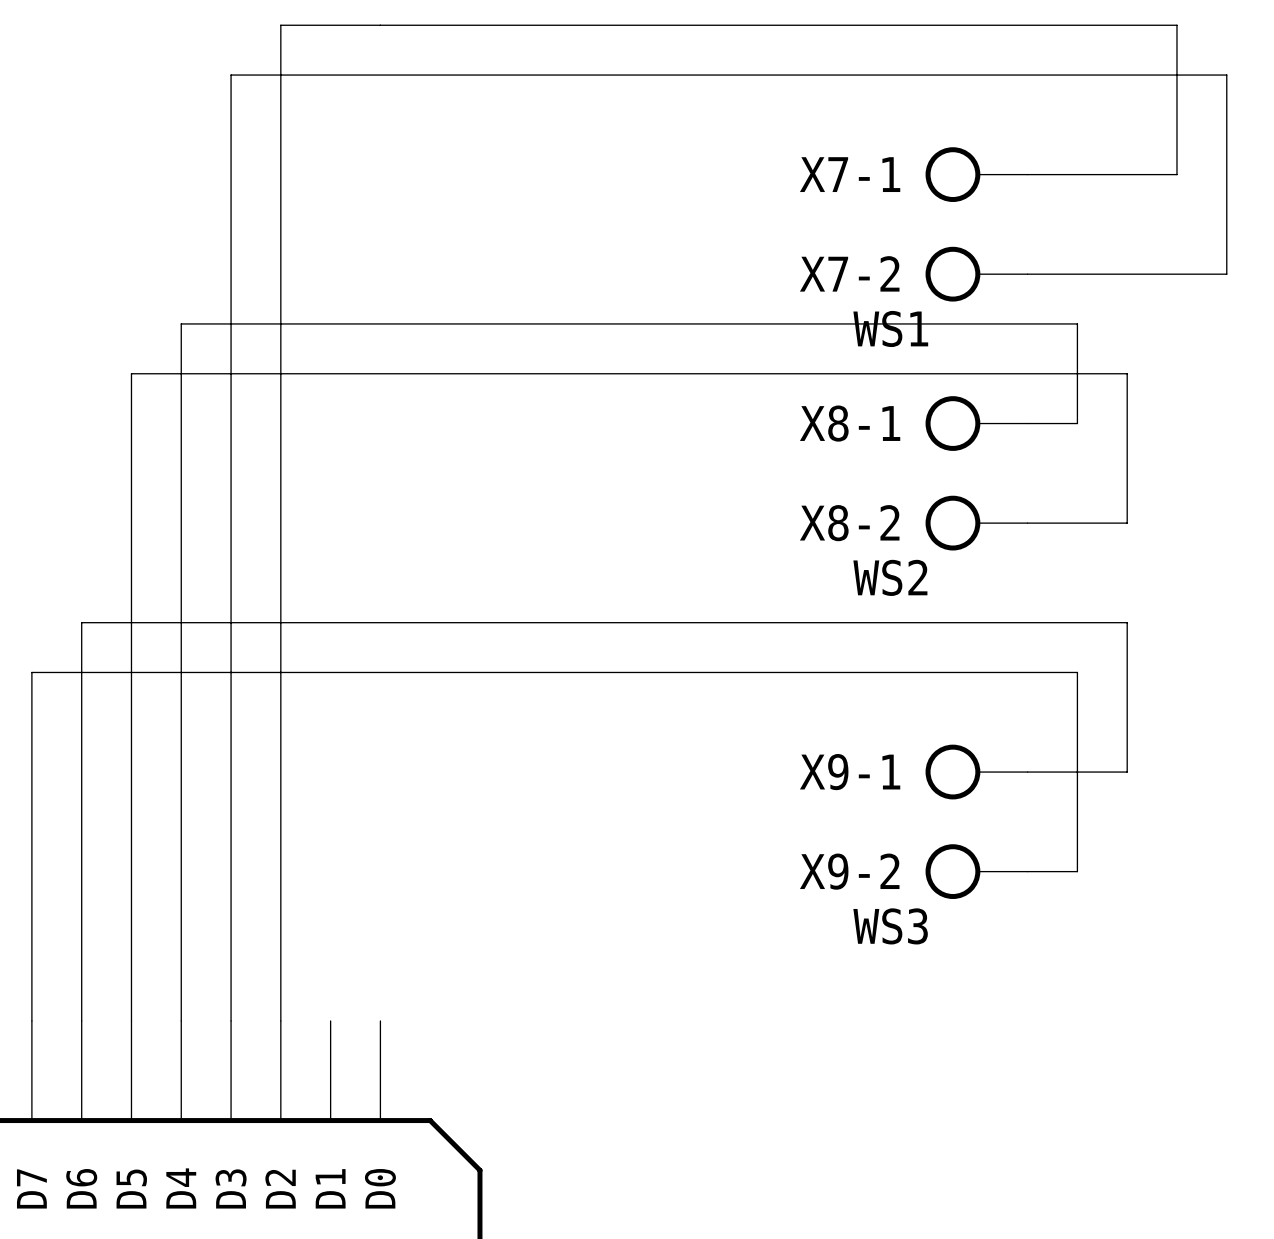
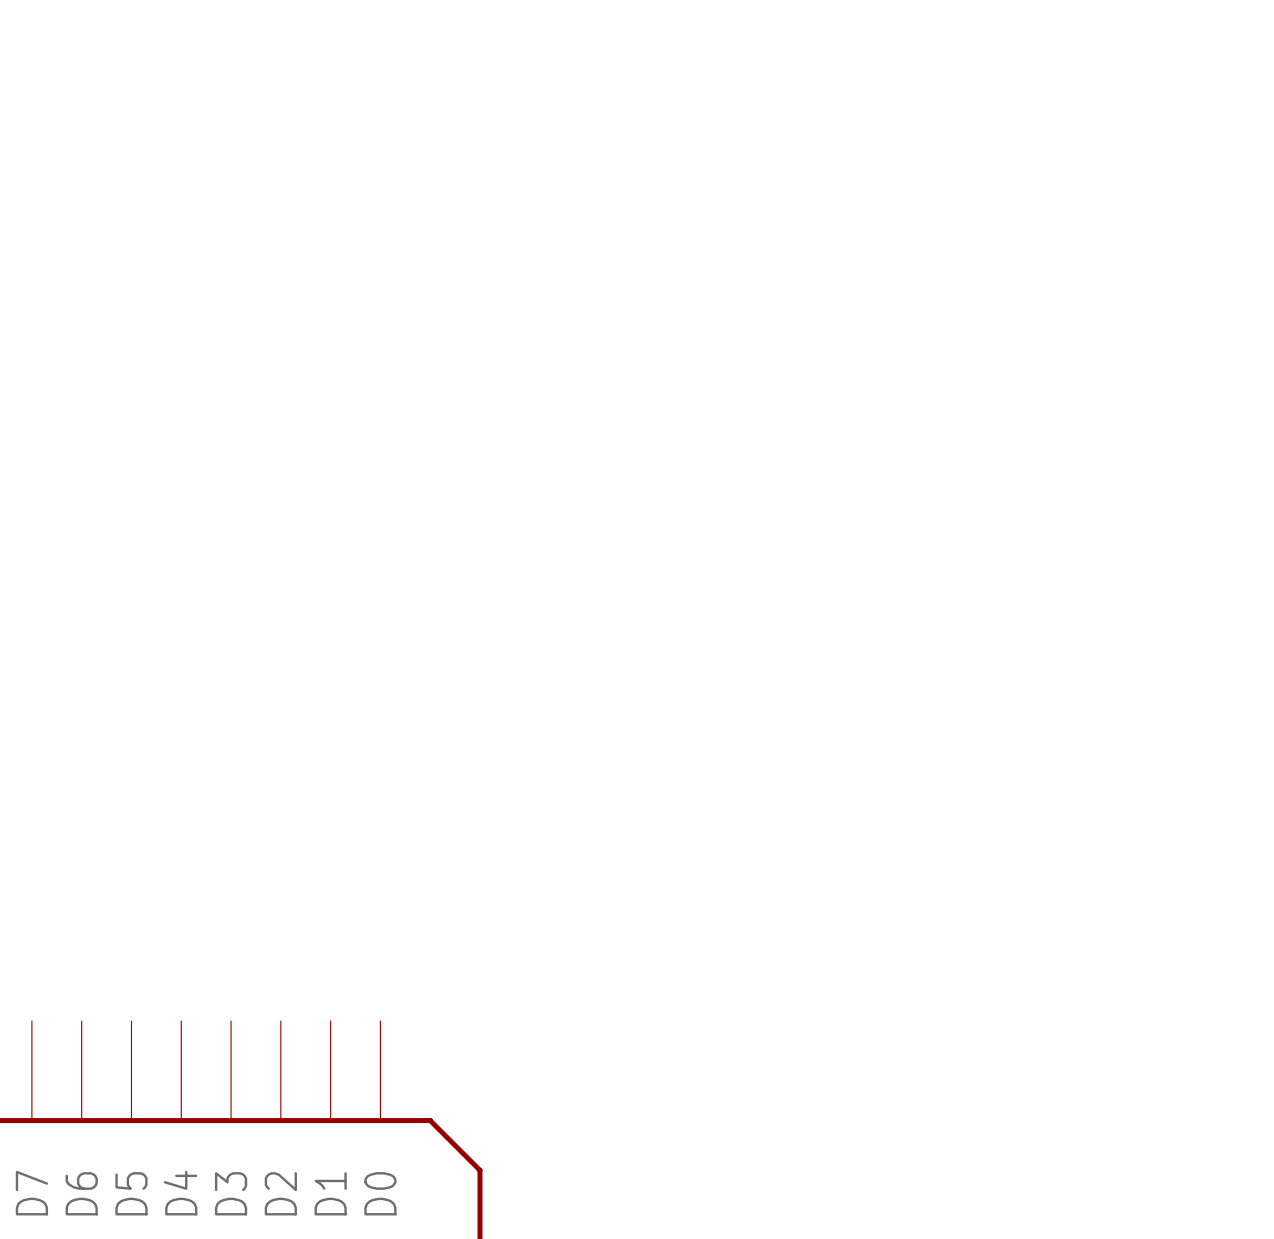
X7-1: (976, 174) -> none
wire: (1027, 174) (1176, 174) (1176, 25) (280, 25) (280, 1020) -> none
X7-2: WS1 (976, 274) -> none
wire: (1027, 274) (1226, 274) (1226, 75) (231, 75) (231, 1020) -> none
X8-1: (976, 423) -> none
wire: (1027, 423) (1077, 423) (1077, 323) (181, 323) (181, 1020) -> none
X8-2: WS2 (976, 523) -> none
wire: (1027, 523) (1127, 523) (1127, 373) (131, 373) (131, 1020) -> none
X9-1: (976, 772) -> none
wire: (1027, 772) (1127, 772) (1127, 622) (81, 622) (81, 1020) -> none
X9-2: WS3 (976, 871) -> none
wire: (1027, 871) (1077, 871) (1077, 672) (31, 672) (31, 1020) -> none

